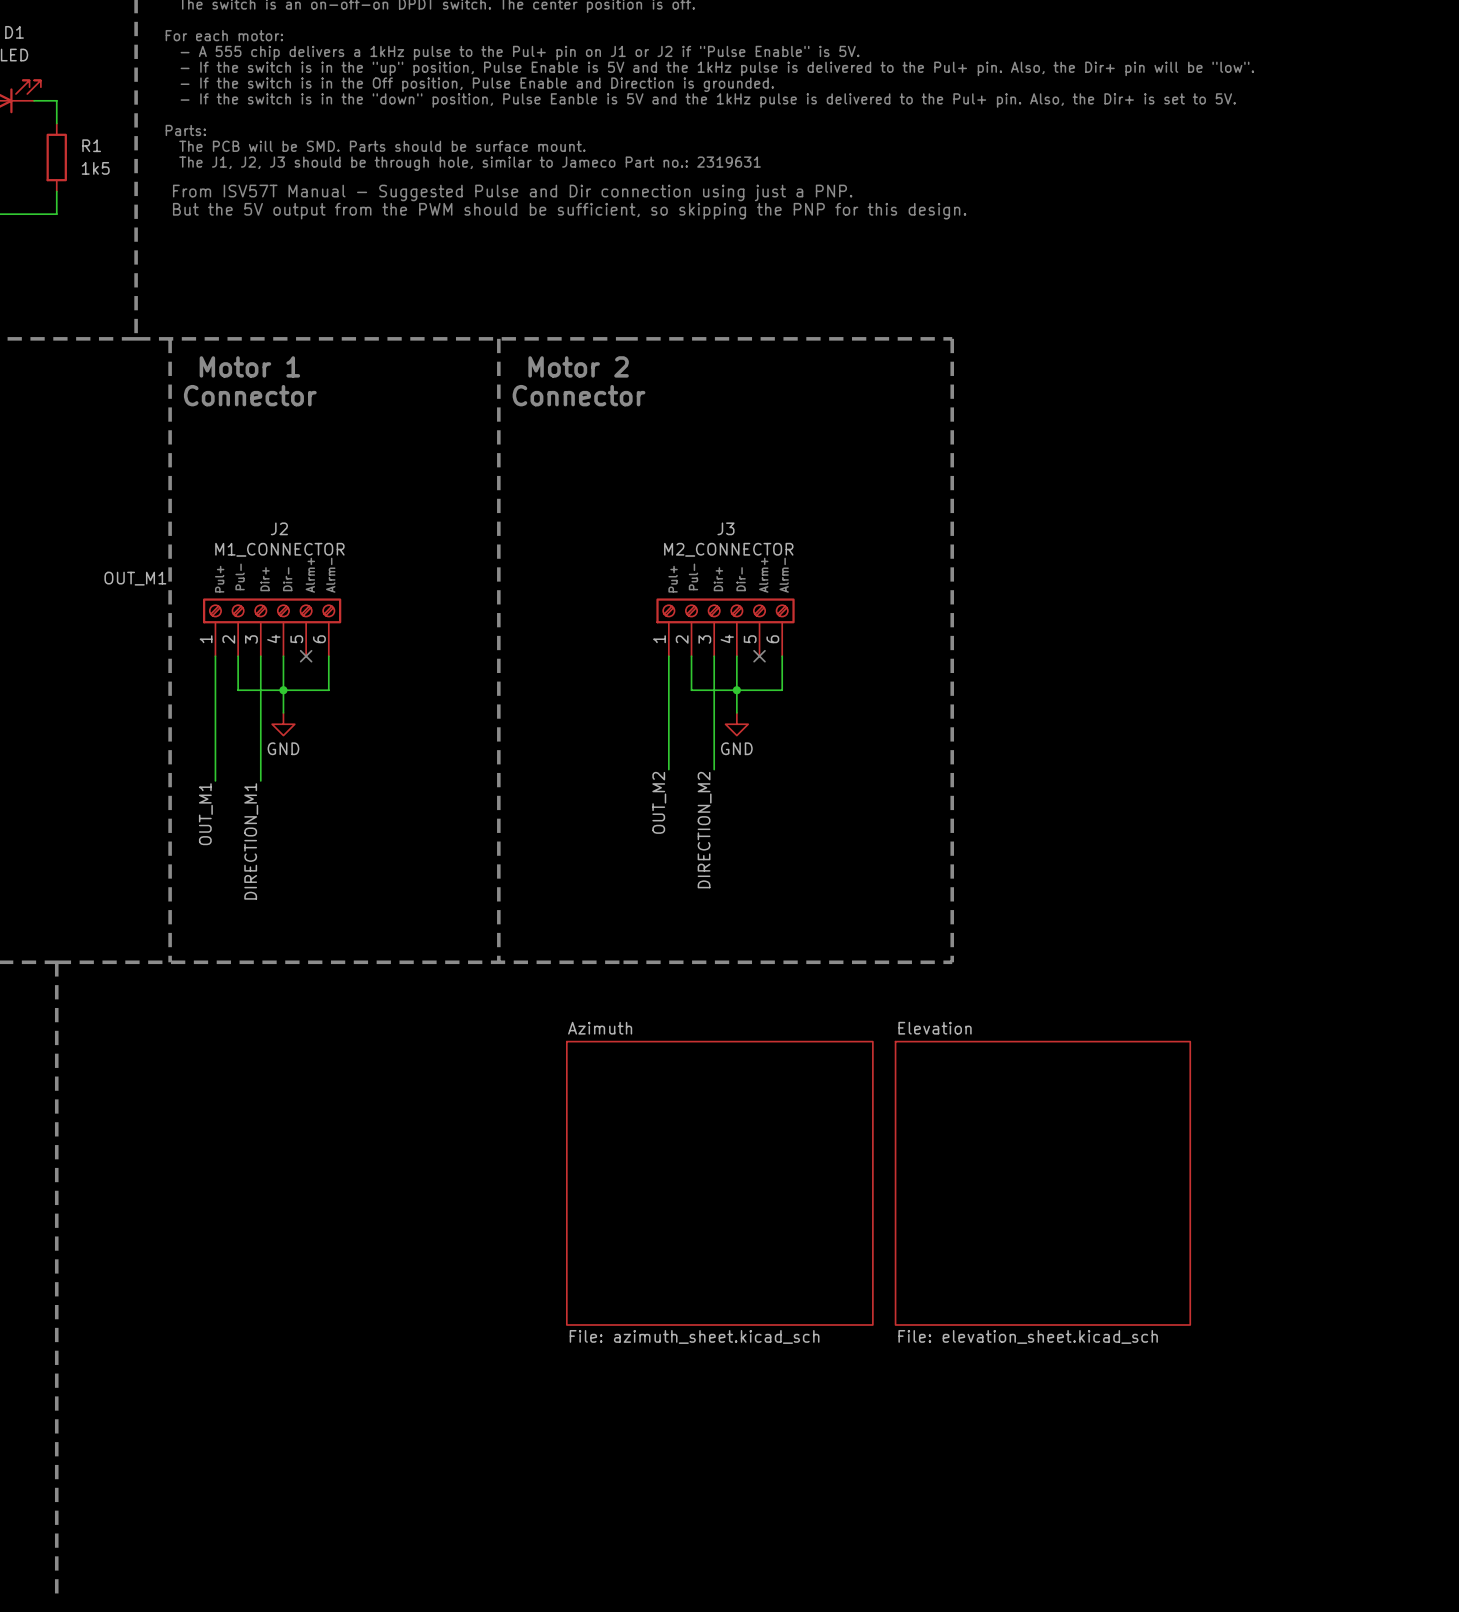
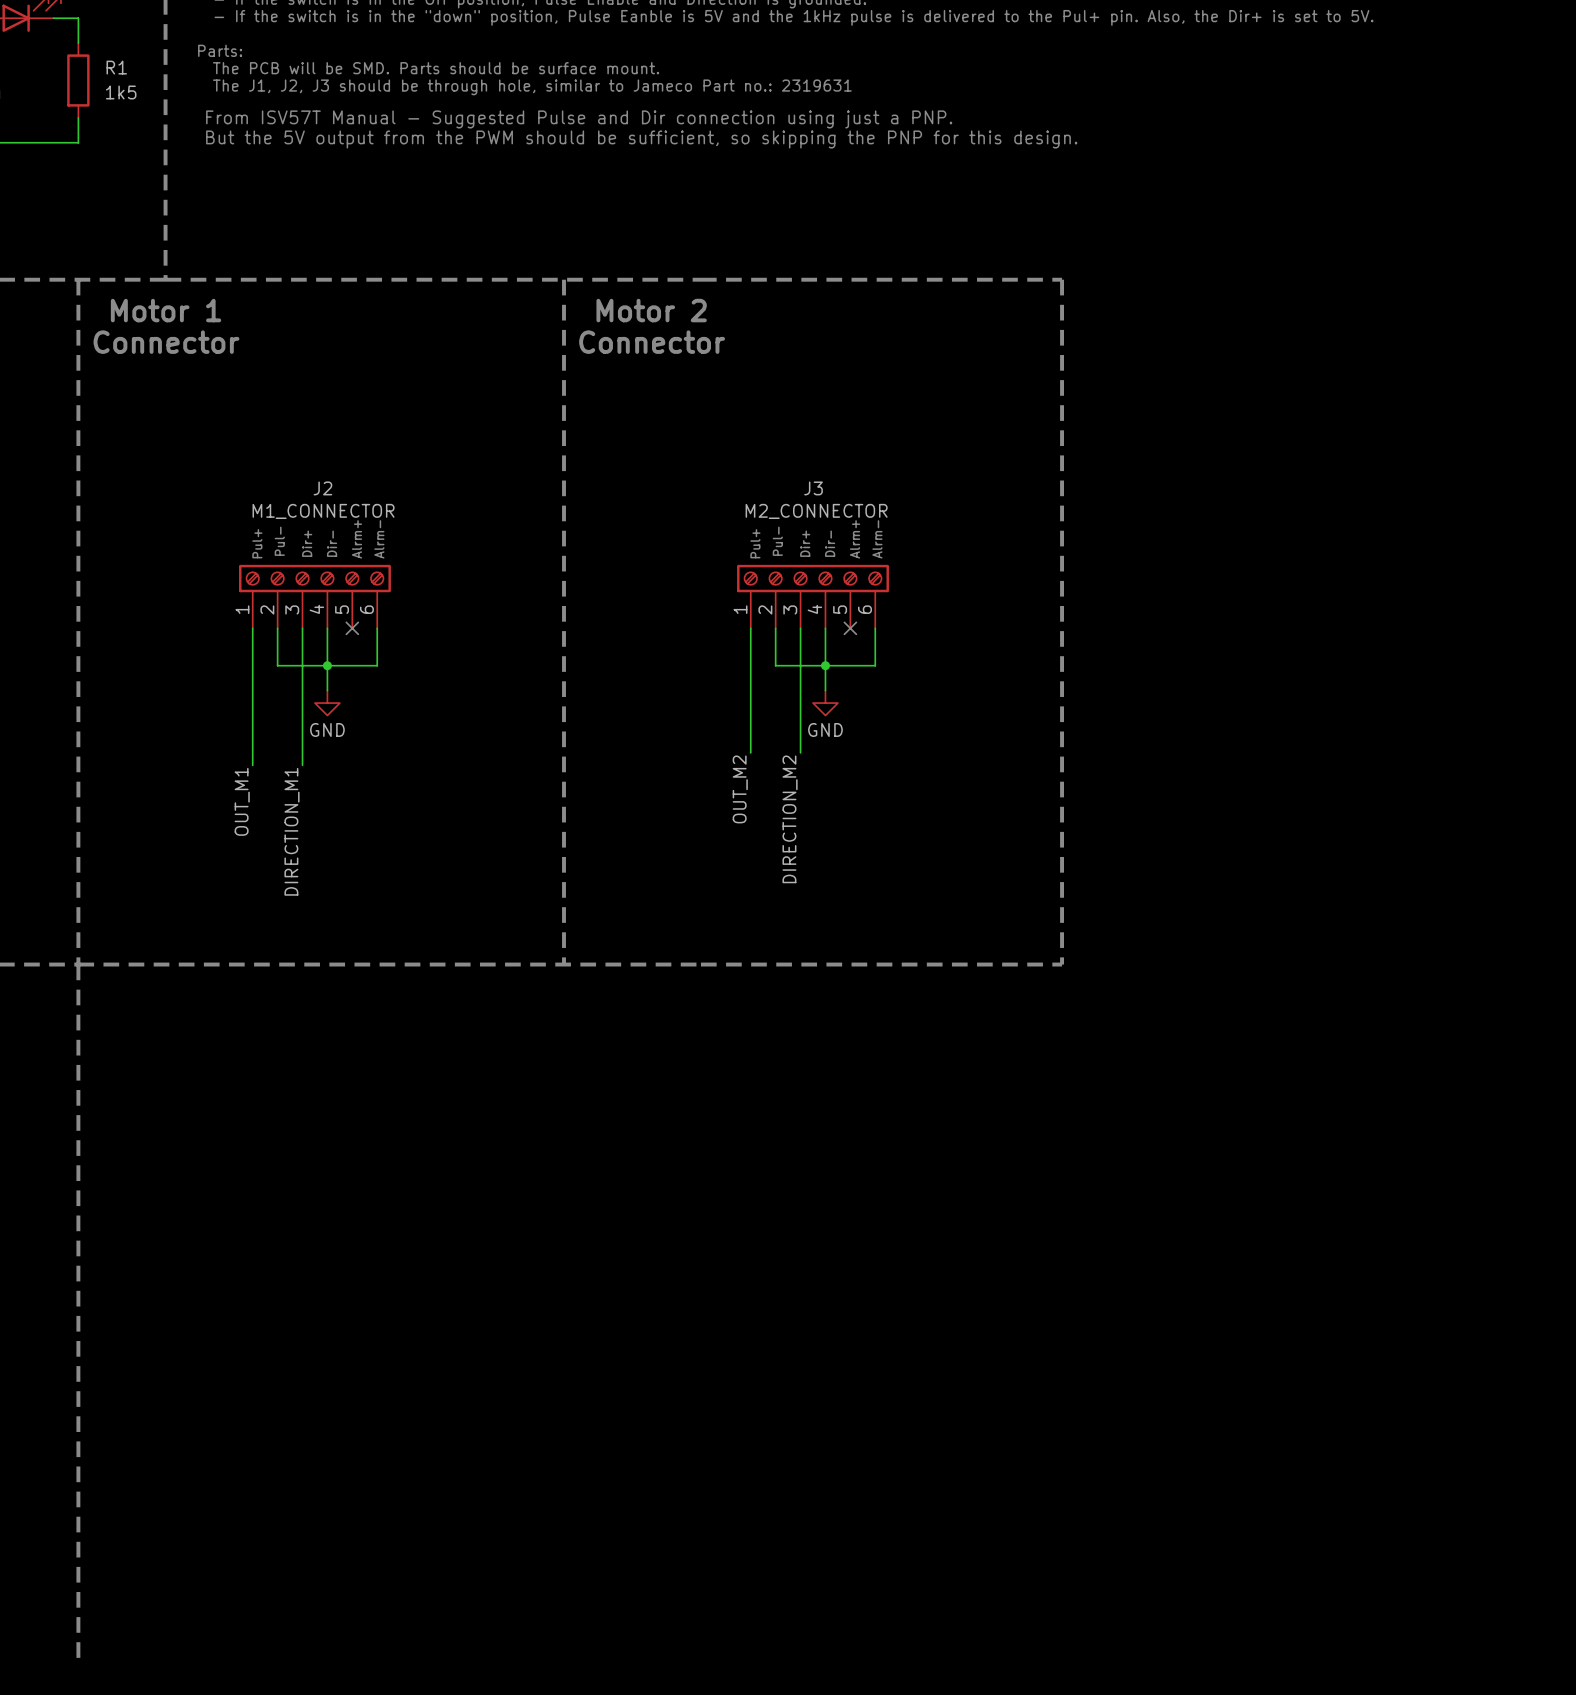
line: (170, 338) (170, 962) -> (78, 279) (78, 964)
text position: Motor 1 (249, 366) -> Motor 1 (166, 310)
text position: Connector (250, 395) -> Connector (166, 342)
label: OUT_M1 (135, 578) -> none
sheet Azimuth: File: azimuth_sheet.kicad_sch (719, 1183) -> none
sheet Elevation: File: elevation_sheet.kicad_sch (1042, 1183) -> none

